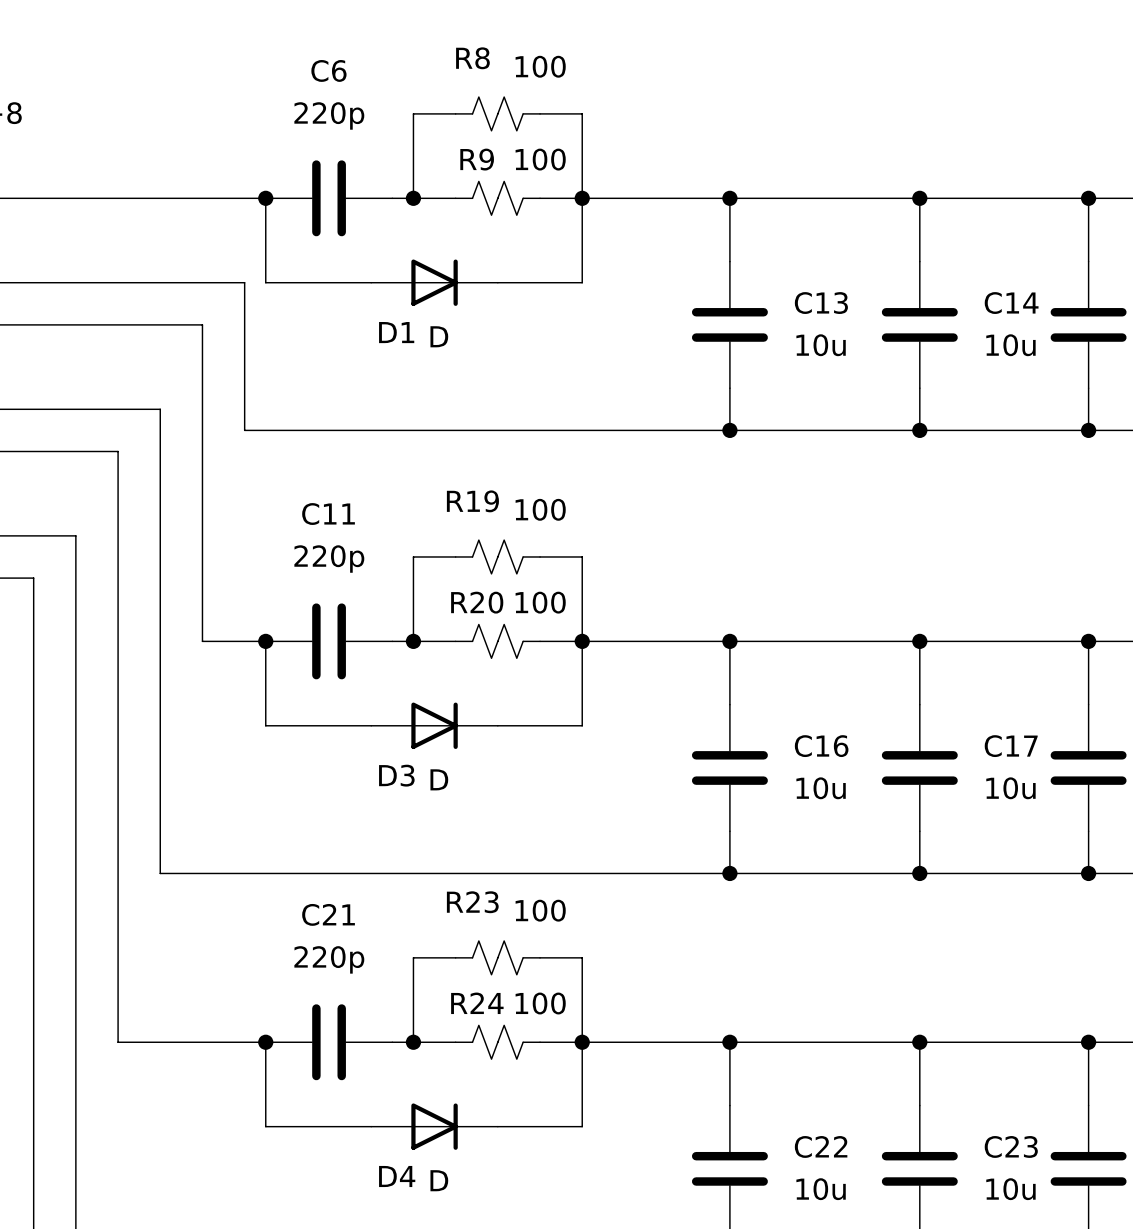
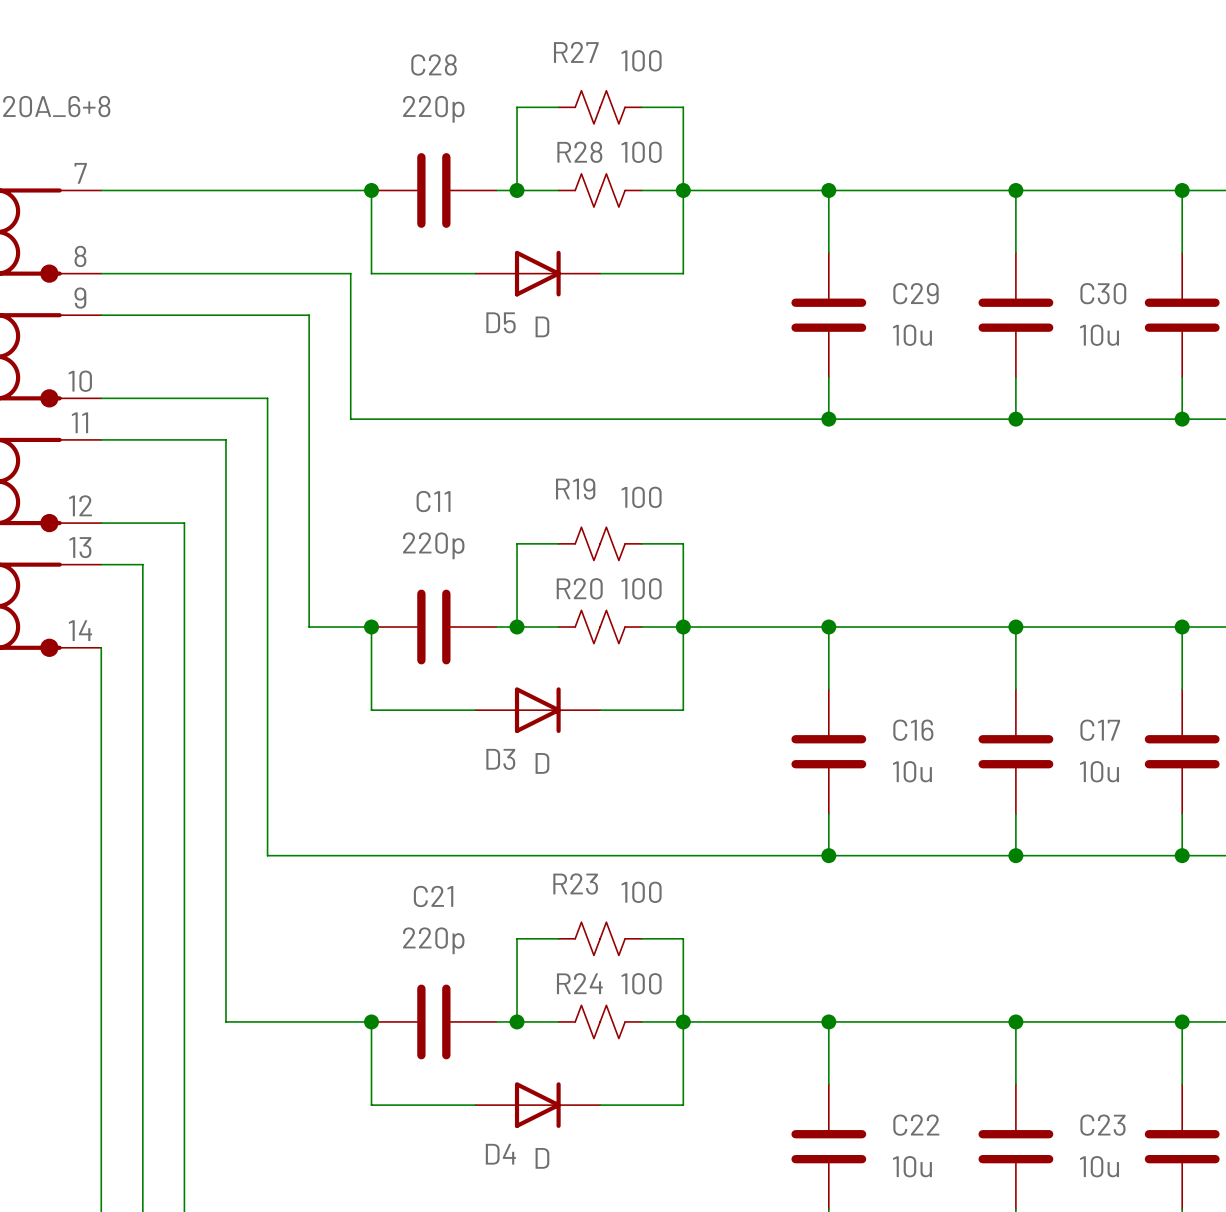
R8 name: R8 (472, 58) -> R27 (576, 52)
C6 name: C6 (328, 70) -> C28 (434, 64)
R9 name: R9 (477, 159) -> R28 (579, 152)
C13 name: C13 (821, 303) -> C29 (915, 293)
C14 name: C14 (1011, 303) -> C30 (1103, 293)
D1 name: D1 (396, 332) -> D5 (501, 322)

